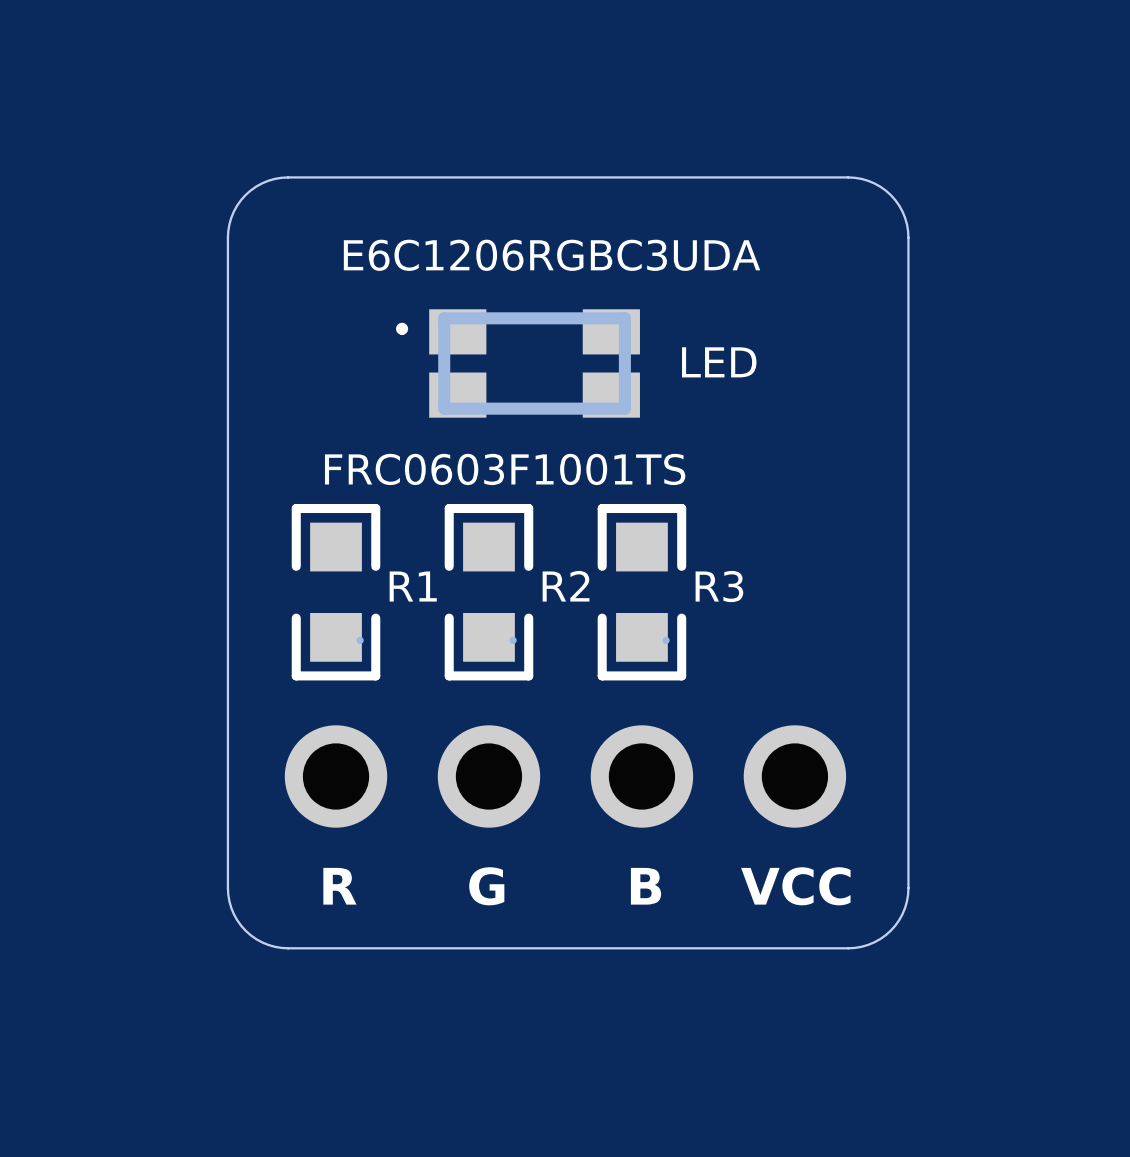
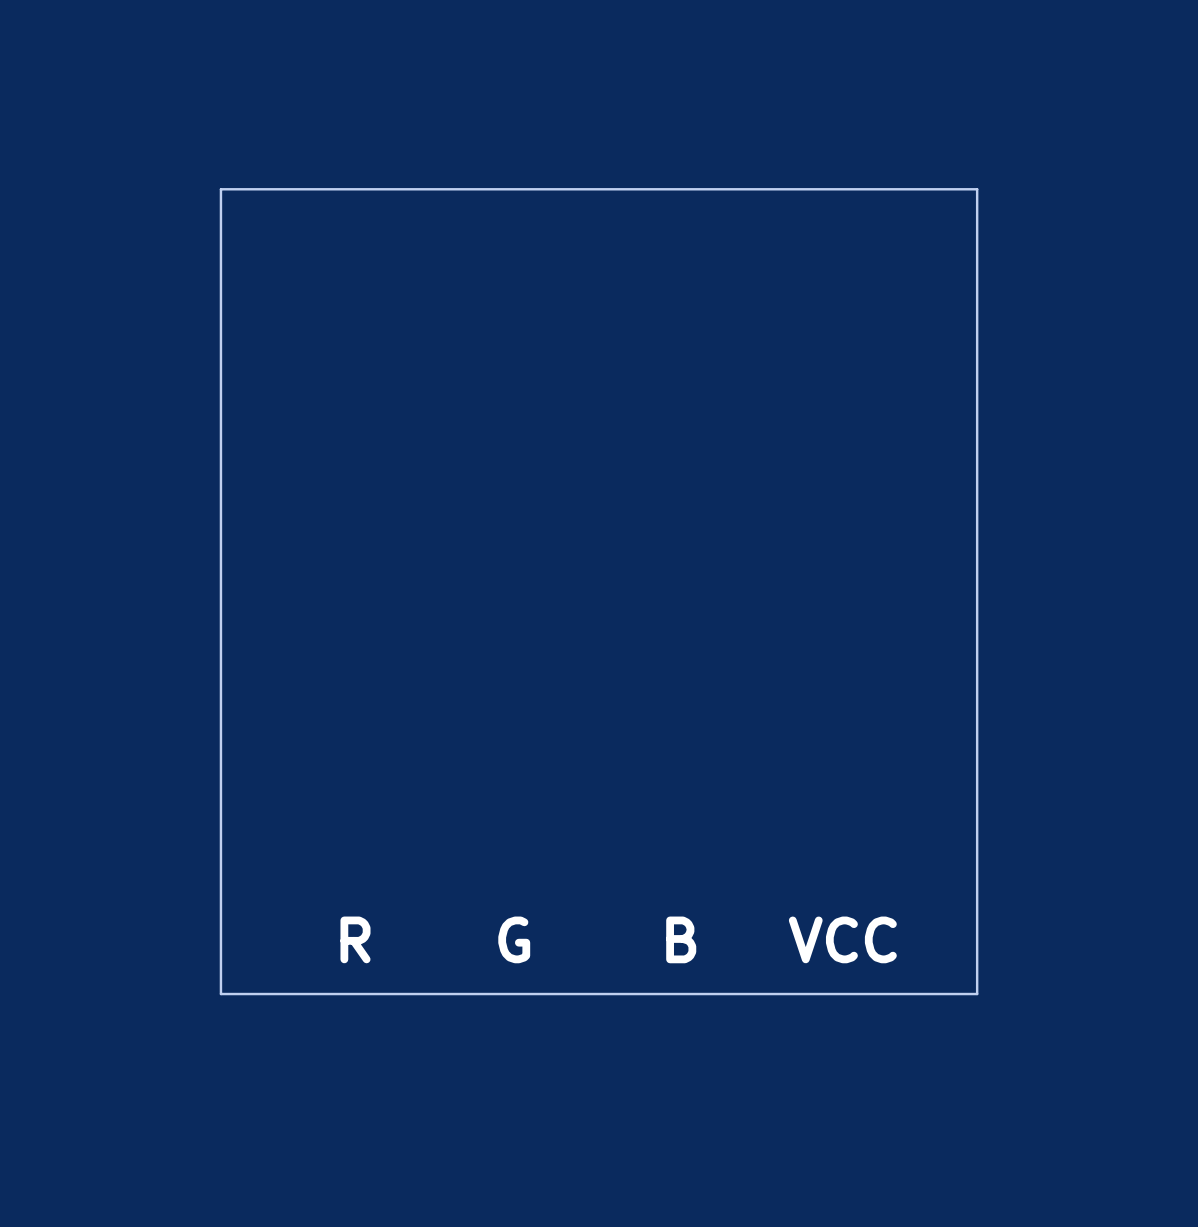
board edge: (288, 177) (848, 177) (861, 178) (874, 183) (885, 190) (895, 200) (905, 217) (908, 237) (908, 888) (906, 901) (902, 914) (895, 925) (885, 935) (868, 944) (848, 948) (288, 948) (274, 946) (262, 942) (250, 935) (241, 925) (231, 907) (227, 888) (228, 230) (233, 211) (245, 195) (262, 183) (274, 178) (288, 177) -> (220, 189) (220, 994) (977, 994) (977, 189) (220, 189)
text: LED (719, 362) -> none
part: E6C1206RGBC3UDA (518, 363) -> none
text: FRC0603F1001TS (505, 469) -> none
R1: (336, 592) -> none
R2: (488, 592) -> none
R3: (641, 592) -> none
part: (565, 776) -> none

